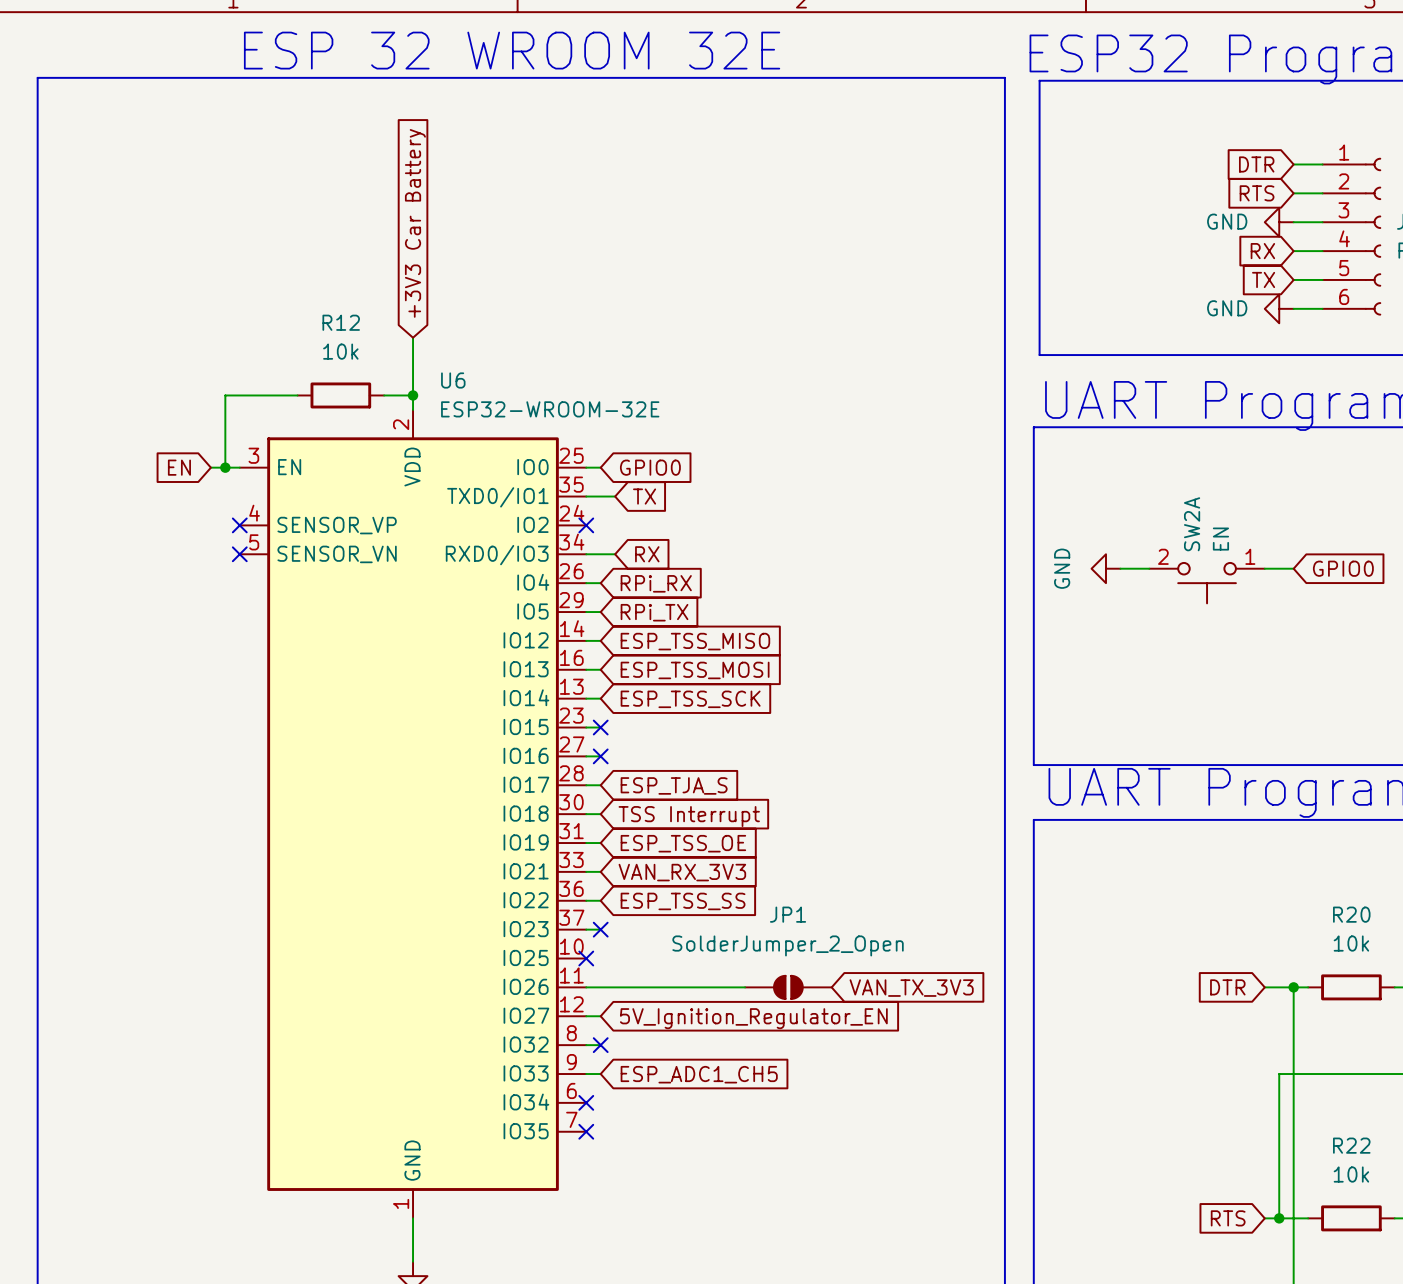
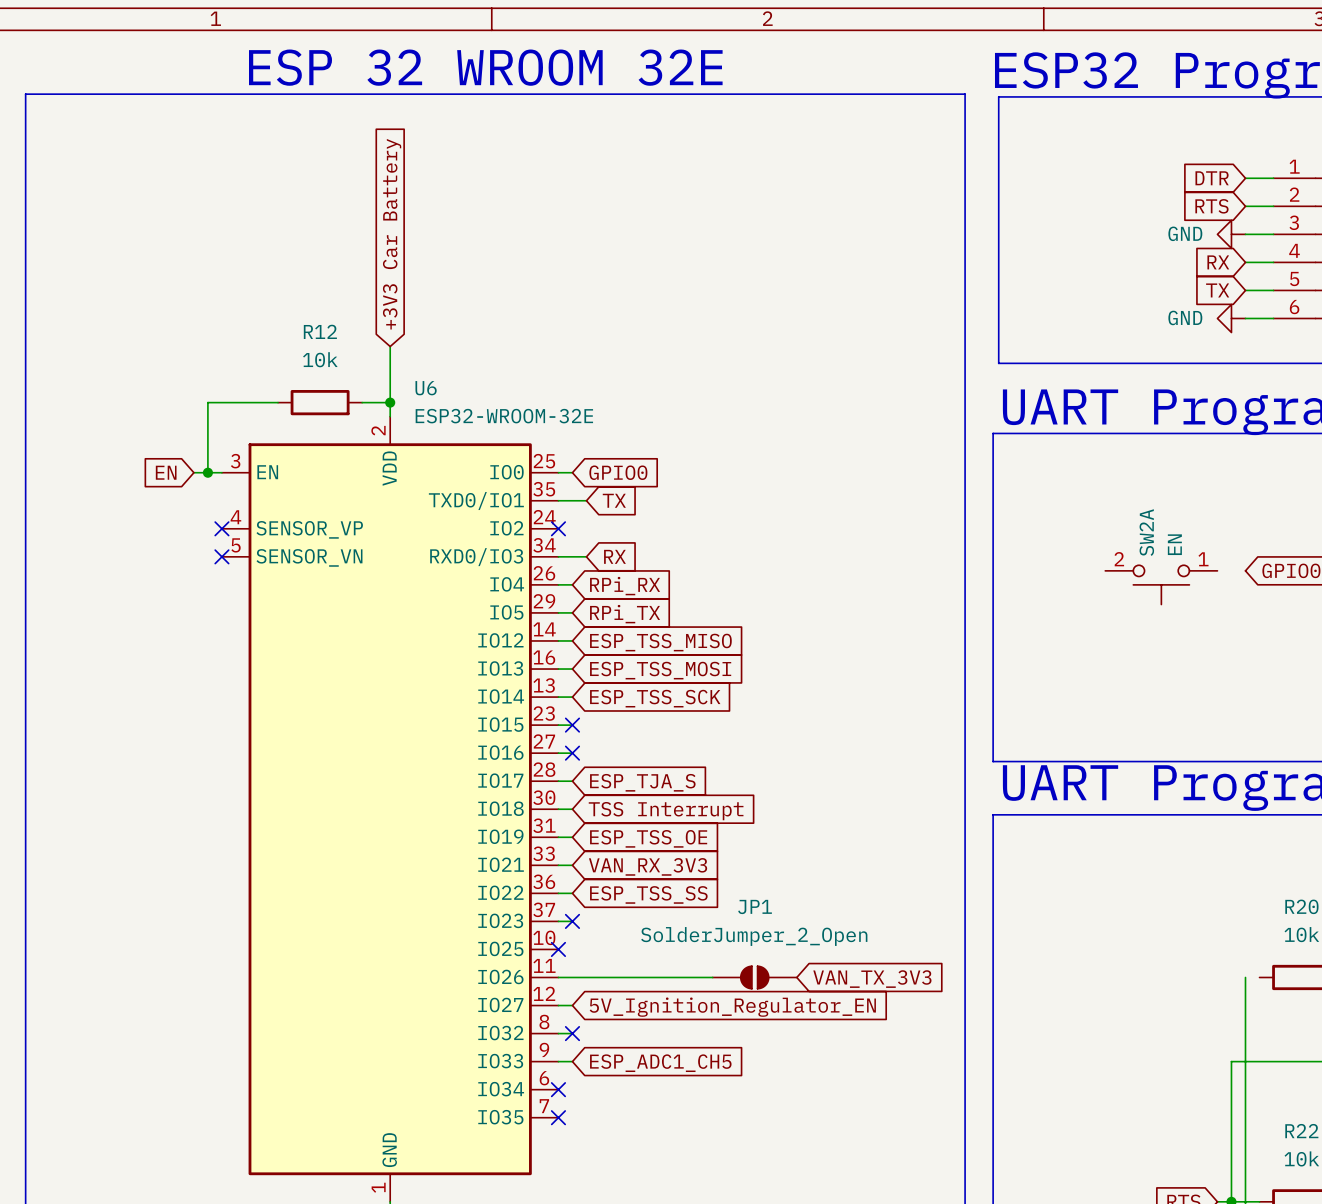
power symbol: GND (1105, 568) -> none
wire: (1120, 568) (1149, 568) -> none
wire: (1264, 568) (1293, 568) -> none
global label: DTR (1227, 987) -> none
wire: (1264, 987) (1308, 987) -> none
junction: (1293, 987) -> none

